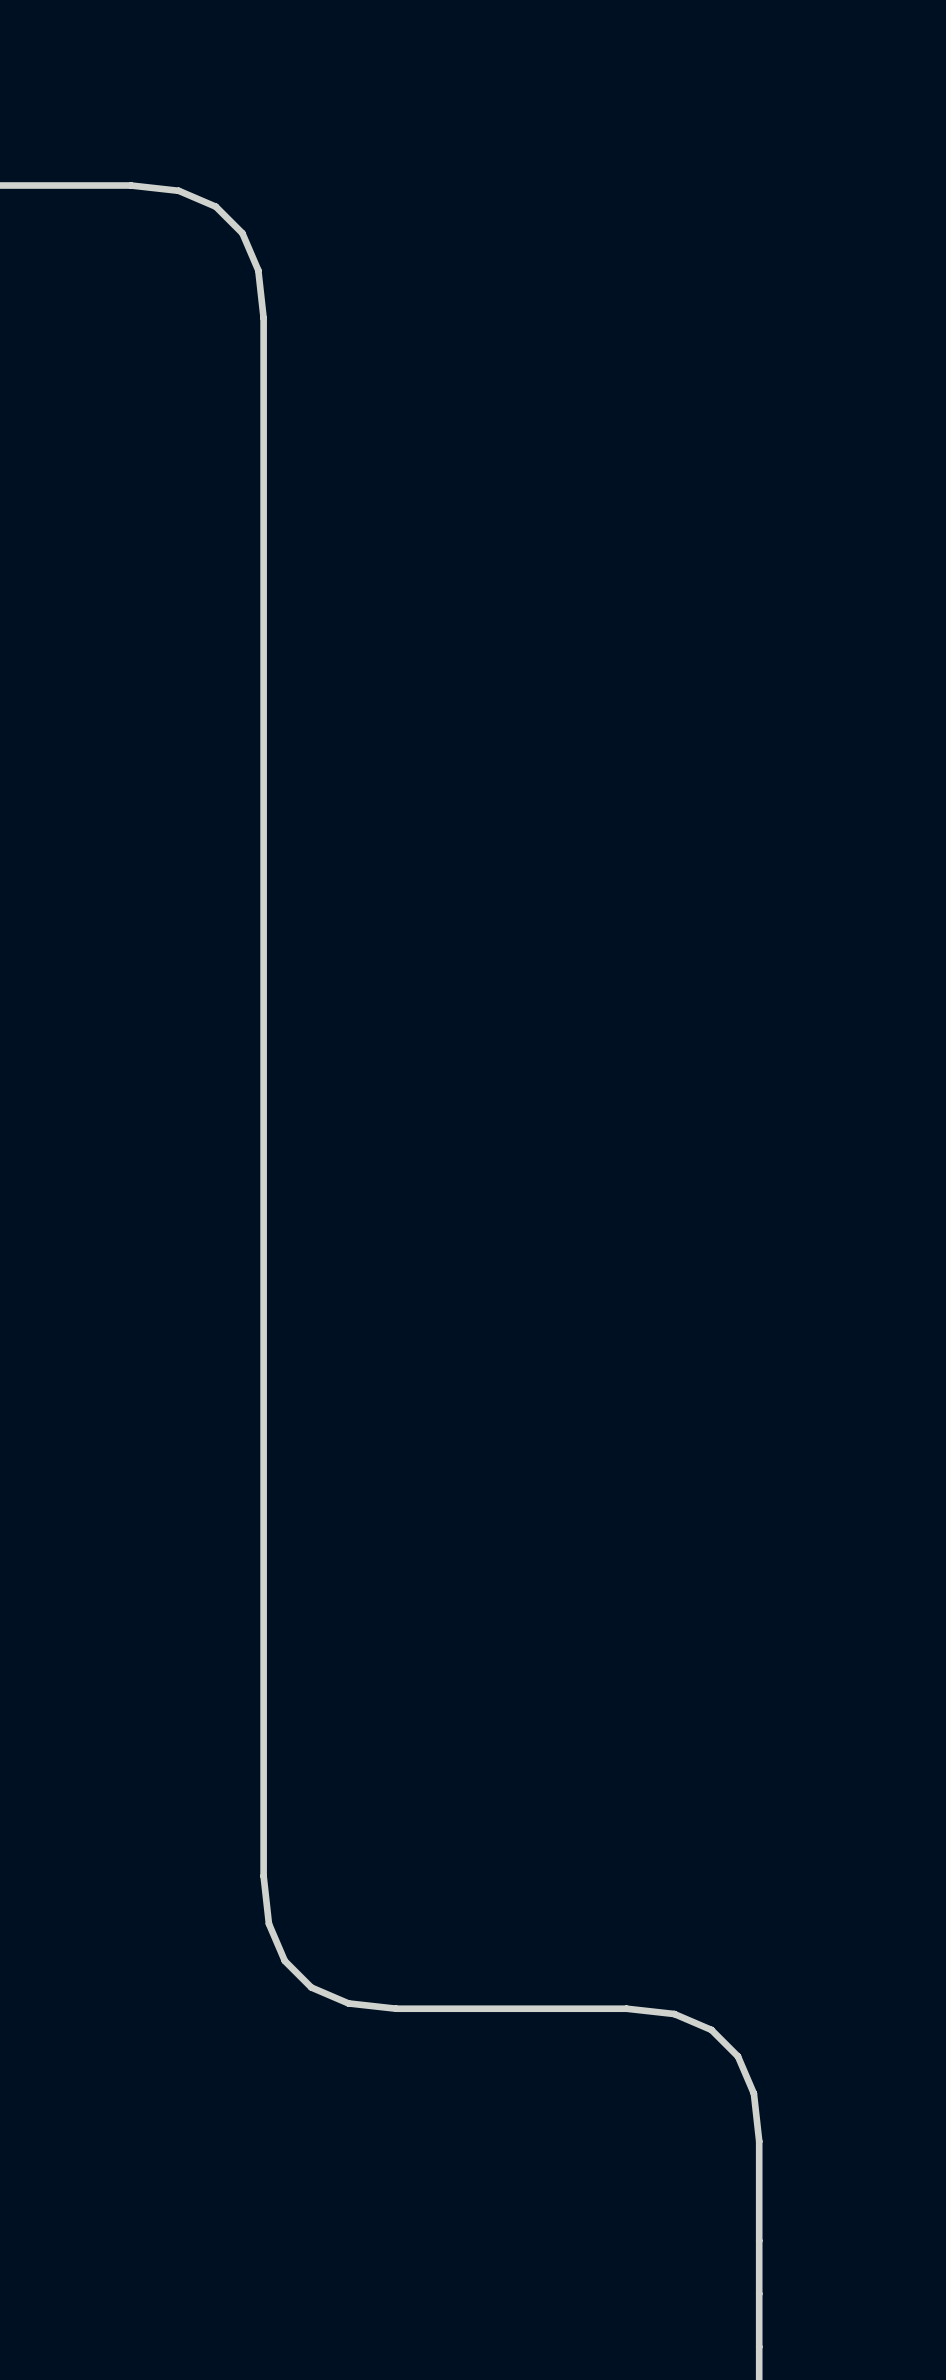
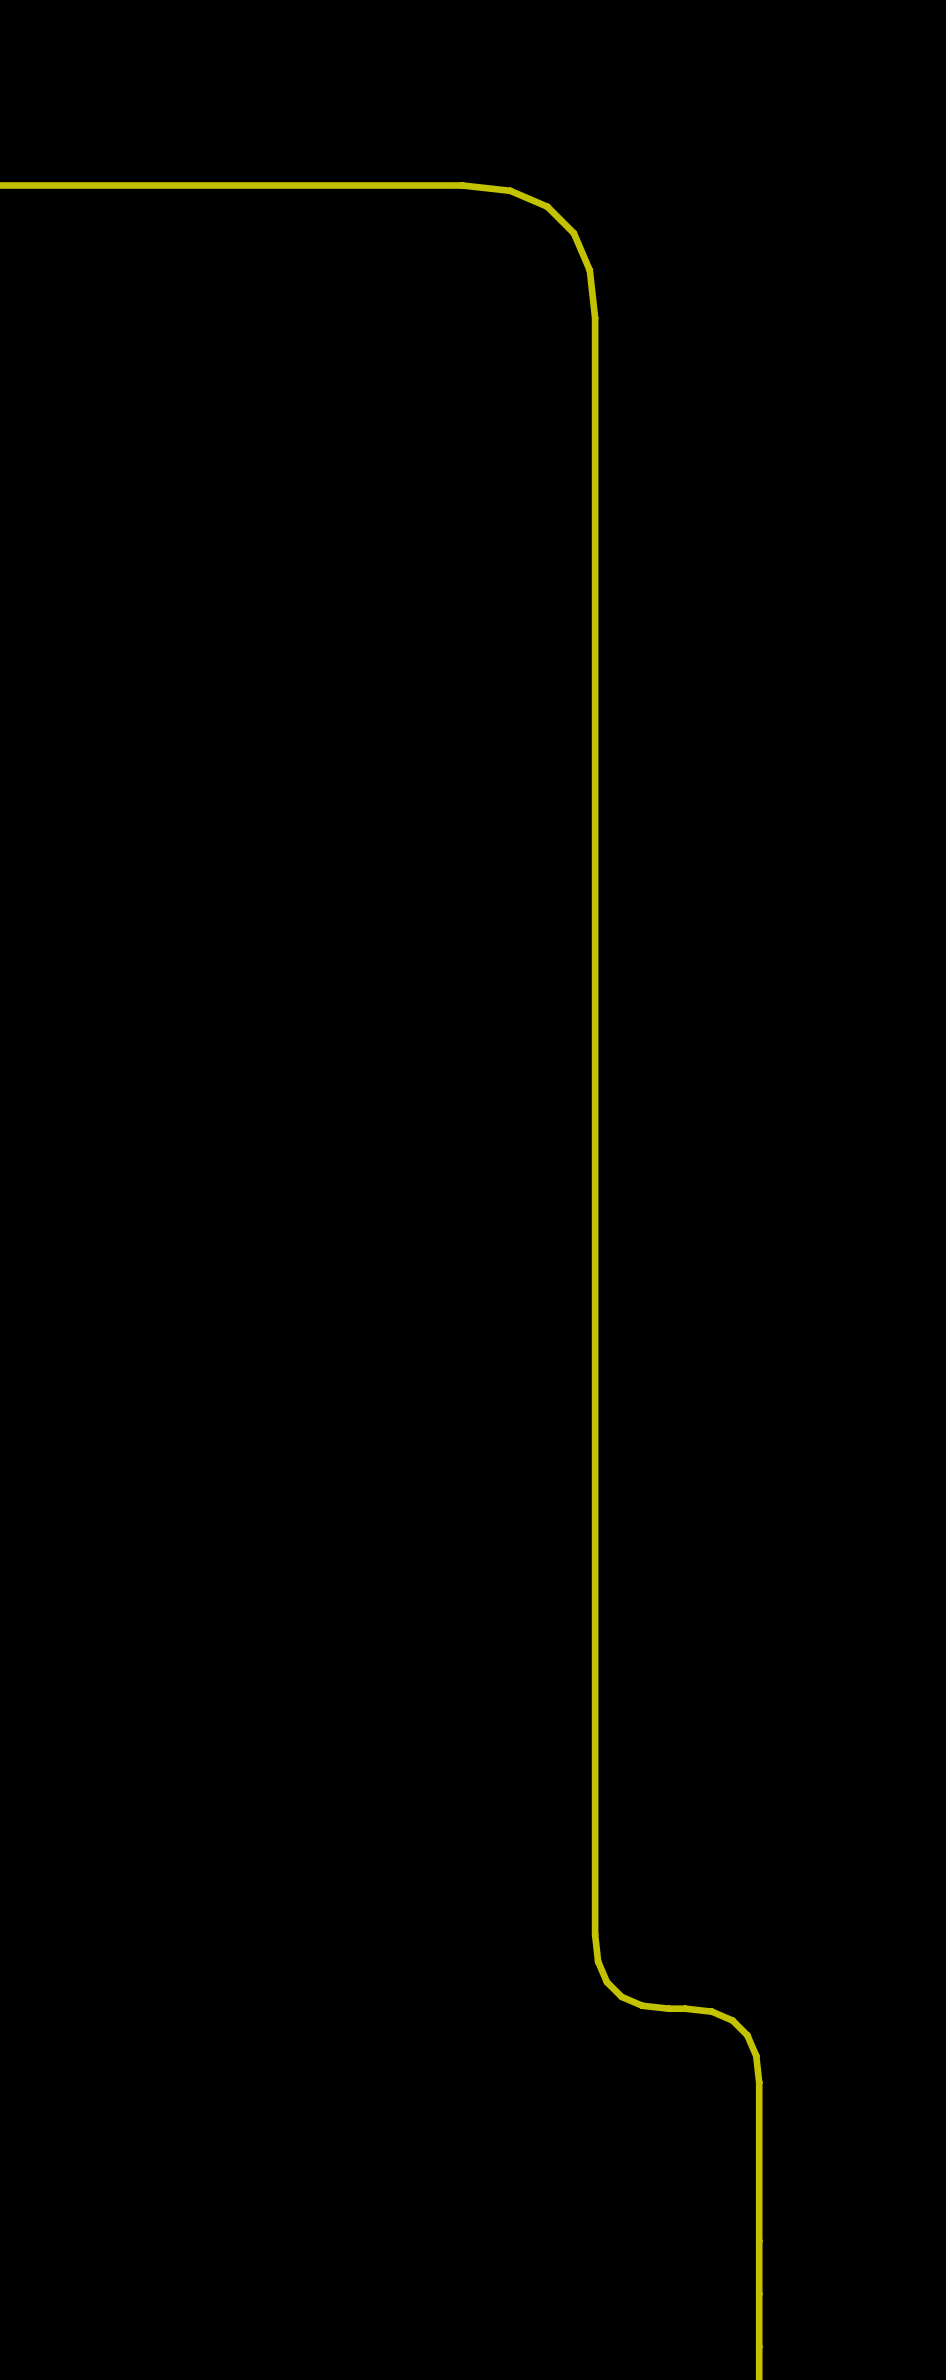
board edge: (131, 185) (178, 190) (215, 206) (242, 233) (258, 270) (263, 318) (263, 1876) (268, 1923) (284, 1960) (311, 1987) (348, 2003) (396, 2008) (626, 2008) (674, 2014) (711, 2029) (737, 2056) (753, 2093) (759, 2141) -> (131, 185) (462, 185) (510, 190) (547, 206) (573, 233) (589, 270) (595, 318) (595, 1934) (598, 1961) (606, 1982) (621, 1996) (642, 2005) (711, 2011) (732, 2020) (747, 2035) (756, 2055) (759, 2082) (759, 2141)

